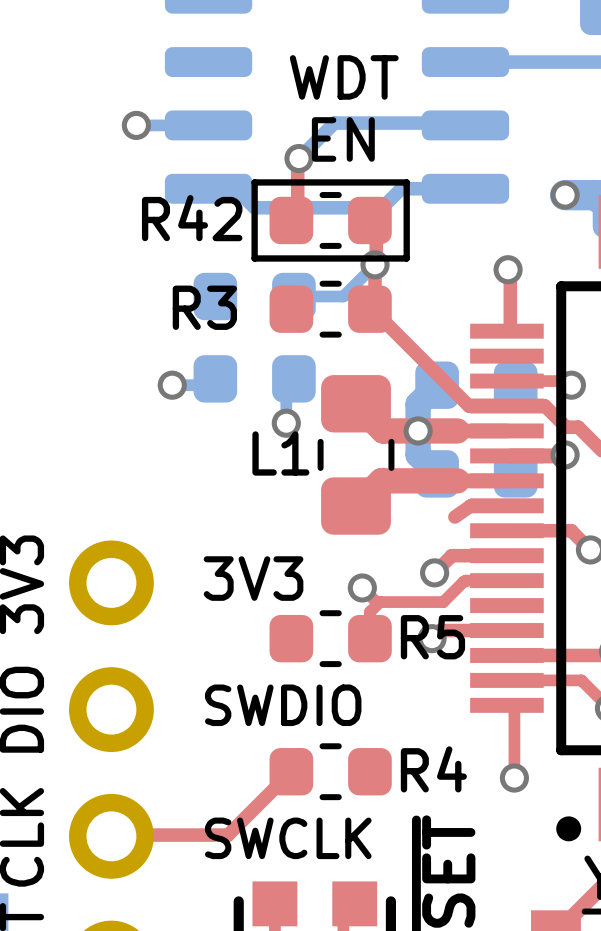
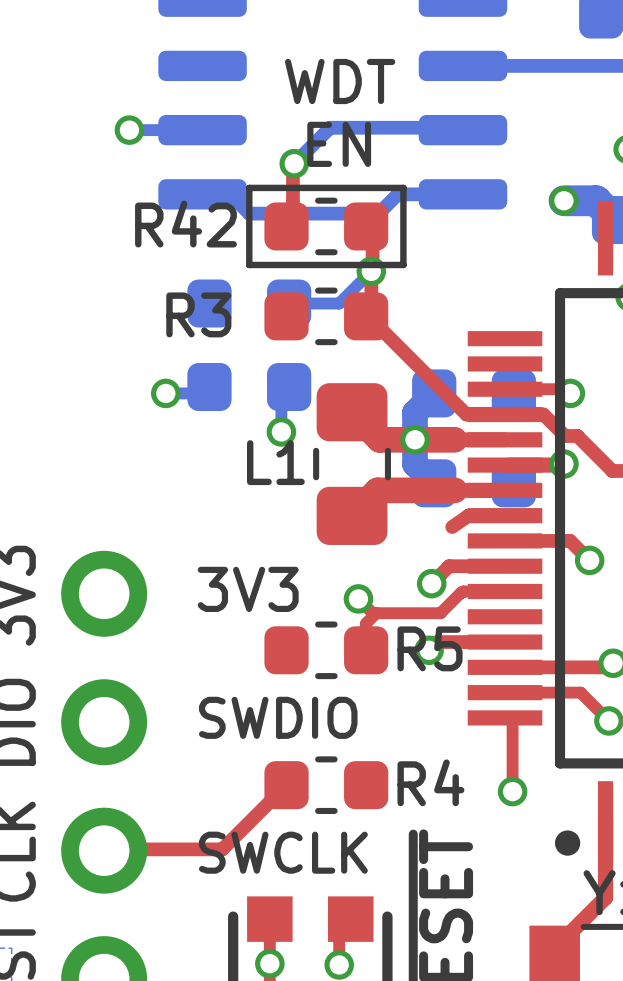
top track: (508, 269) (510, 271) (510, 331) -> none
via: (508, 269) -> none

